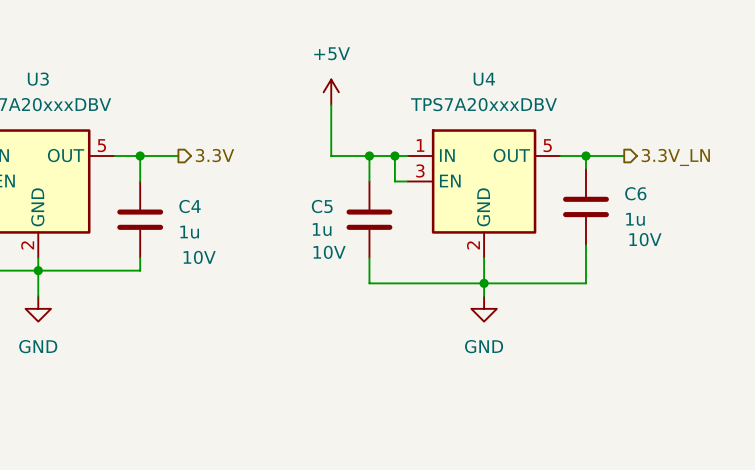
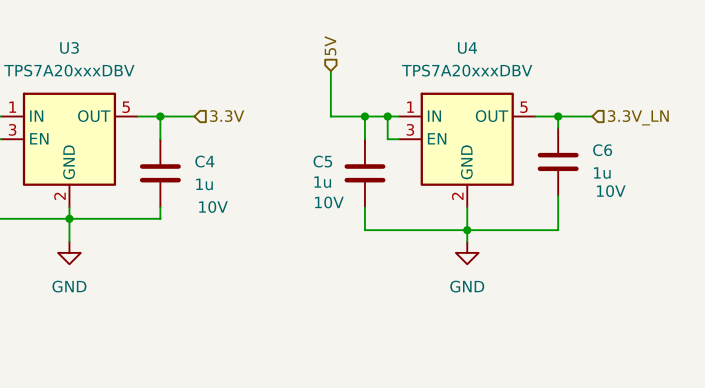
hierarchical label: none -> 5V (330, 45)
power symbol: +5V (331, 92) -> none
hierarchical label shape: output (215, 155) -> input (227, 116)
hierarchical label shape: output (675, 157) -> input (638, 117)

